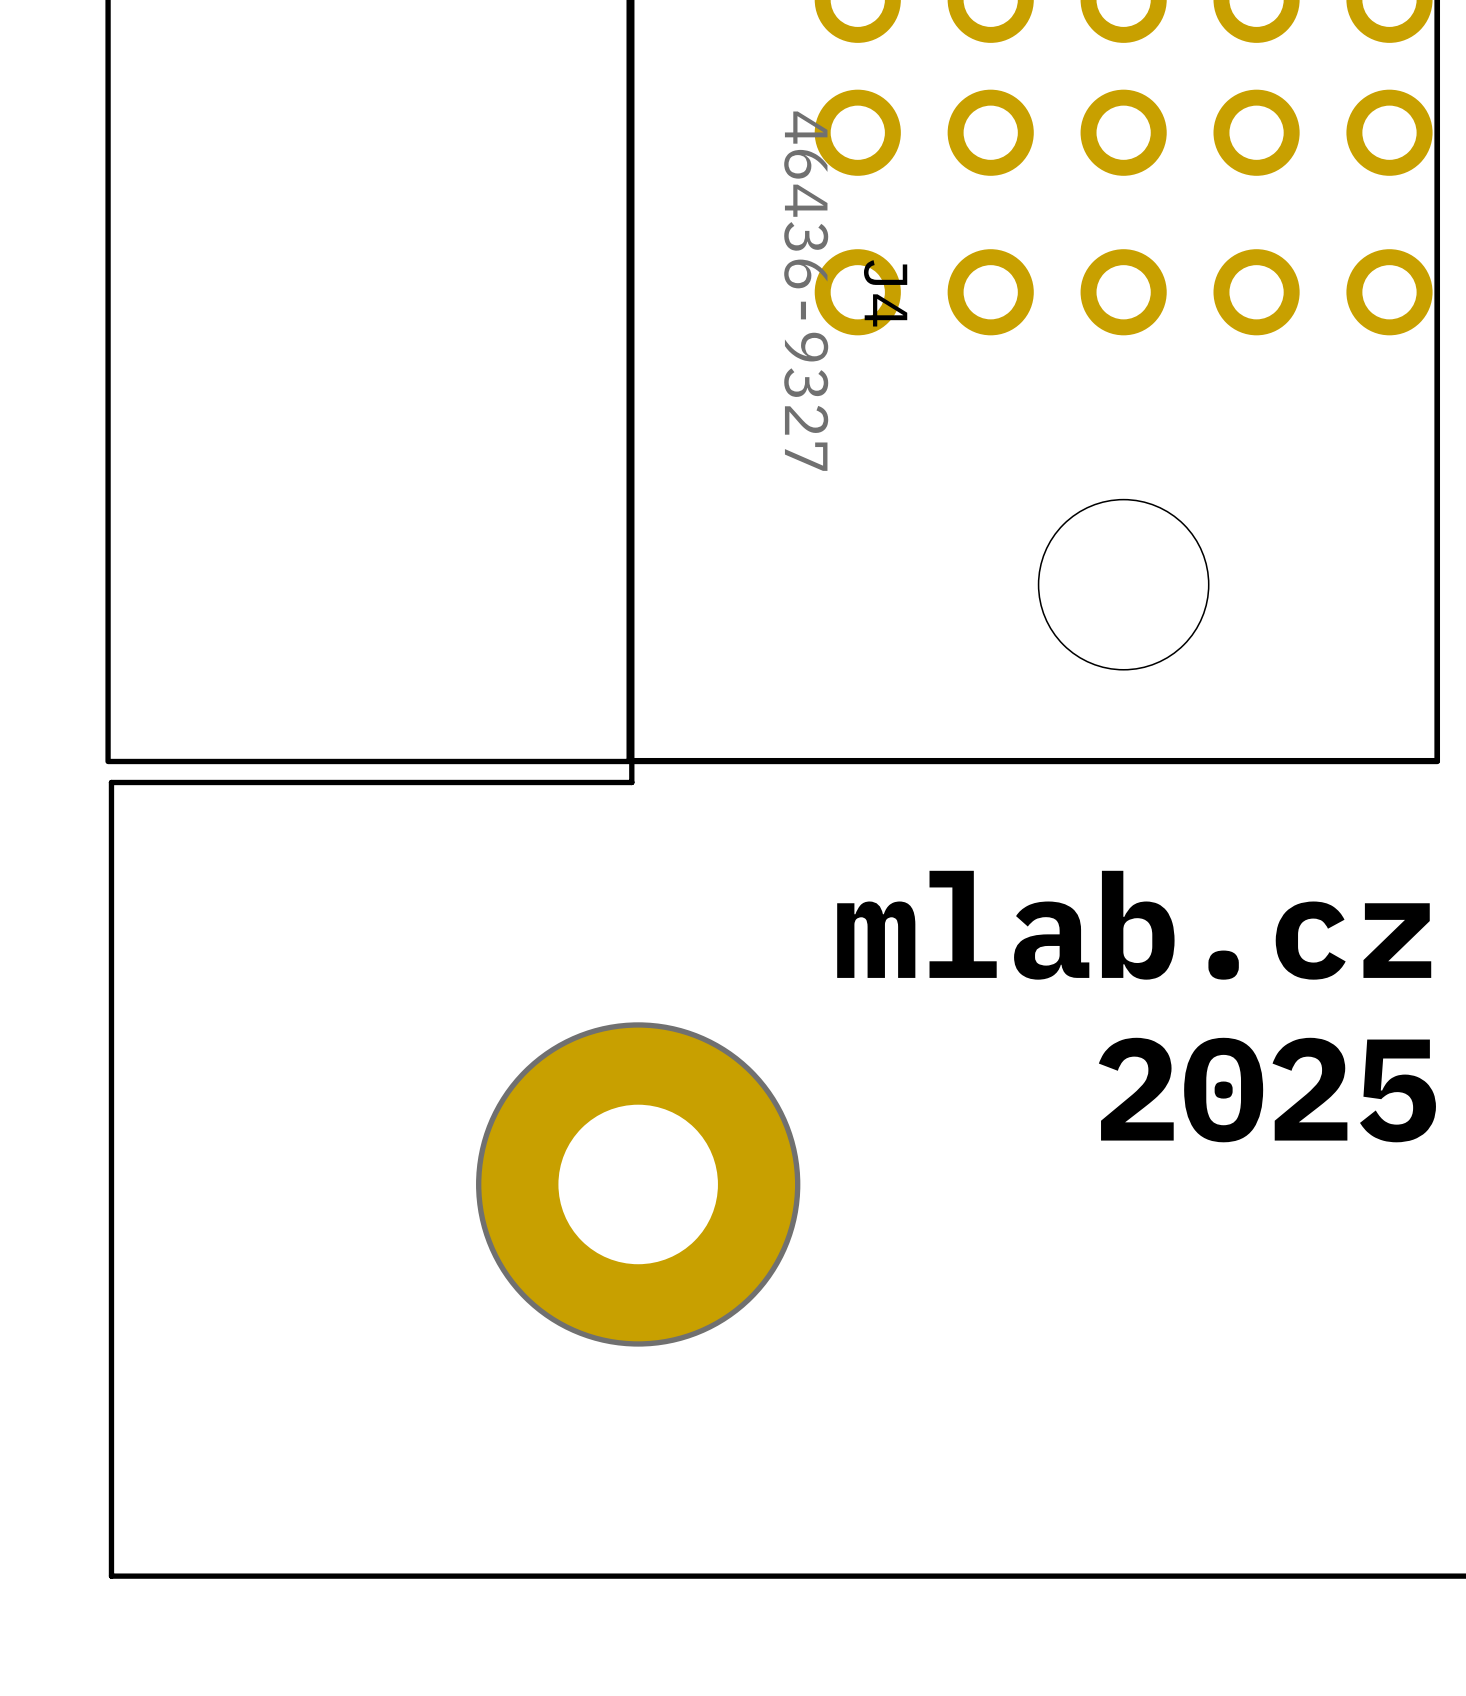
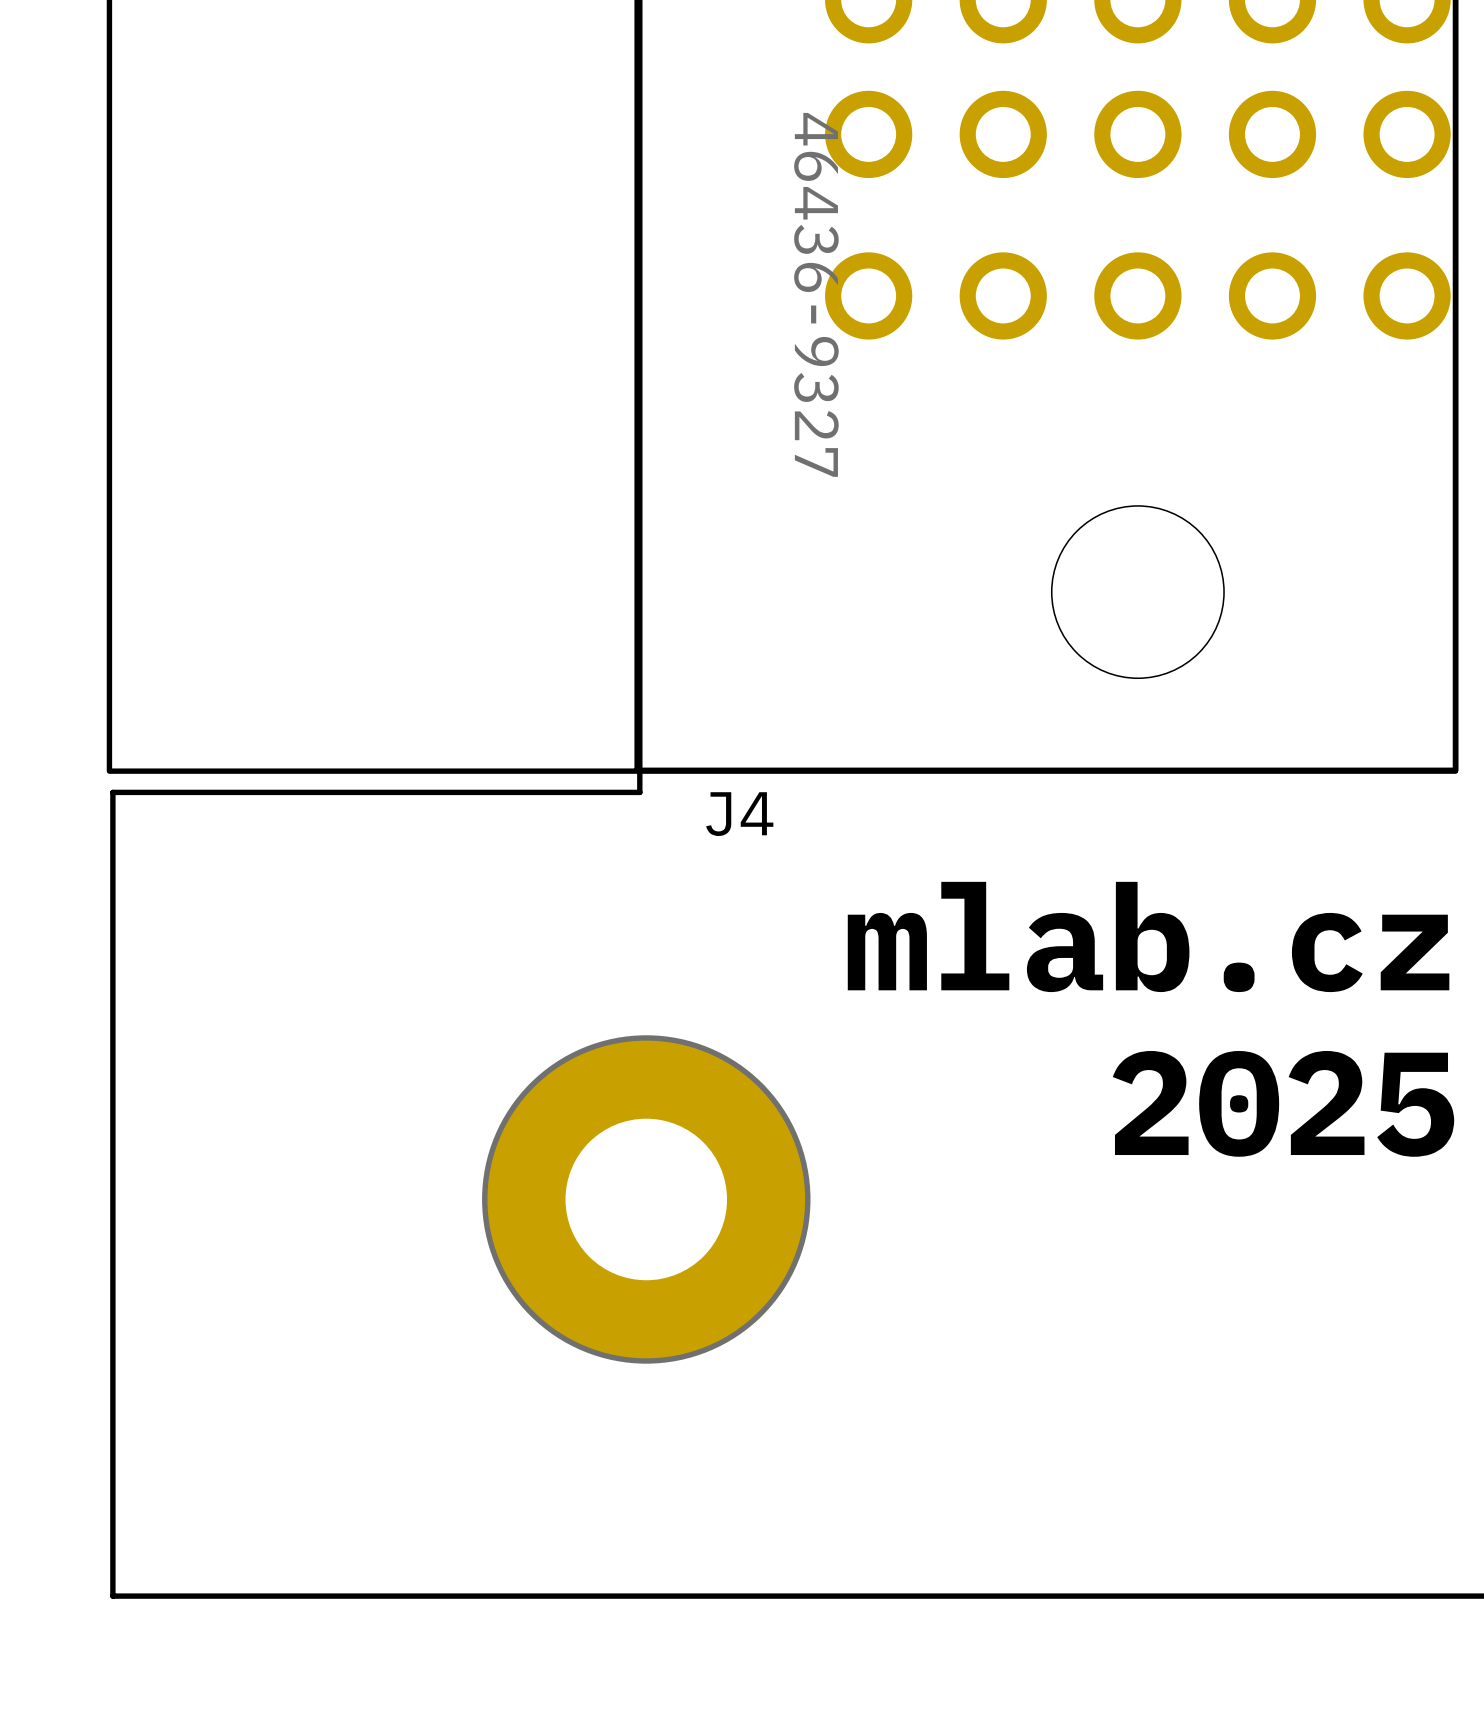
J4 name rotation: 0° (885, 293) -> 90° counterclockwise (739, 814)
J4 name position: J4 (885, 293) -> J4 (739, 814)

